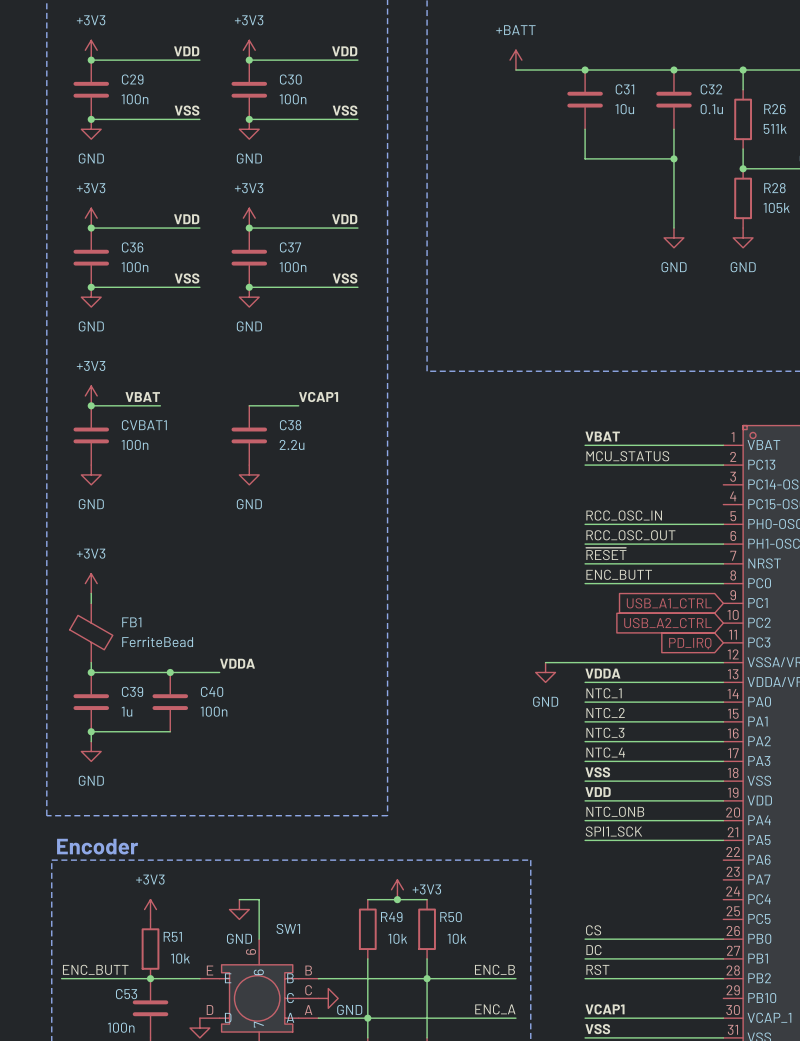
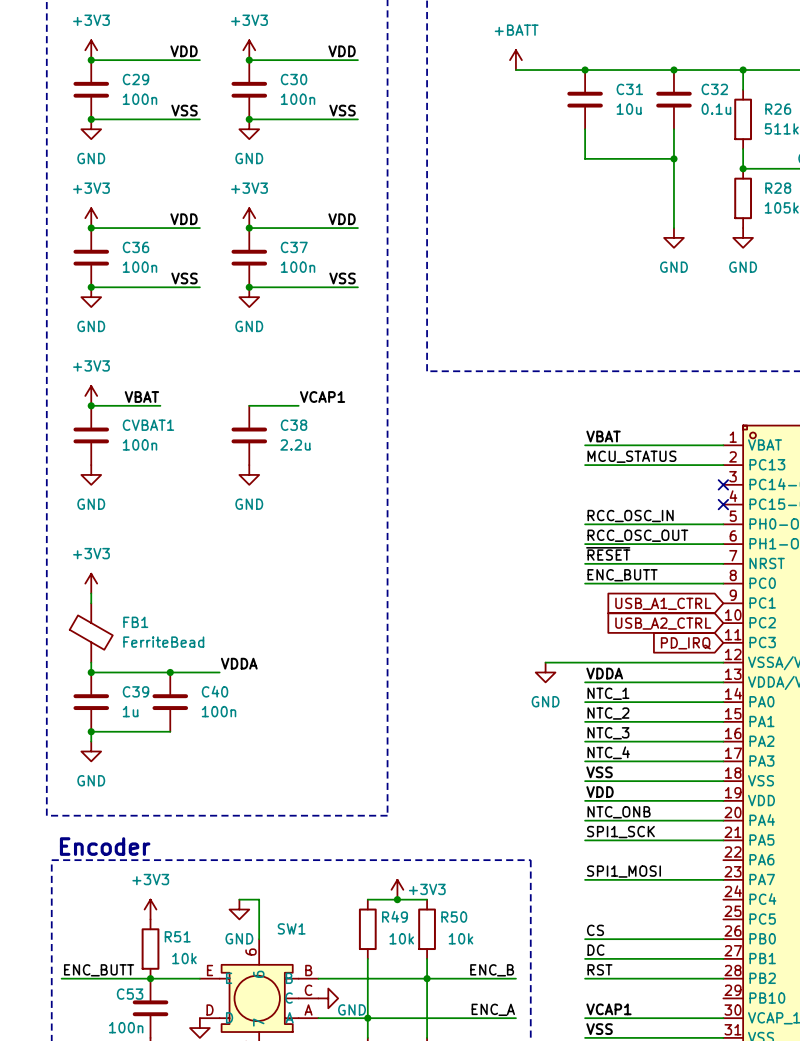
no-connect mark: none -> (723, 484)
no-connect mark: none -> (723, 504)
label: none -> SPI1_MOSI (623, 871)
wire: none -> (585, 879) (723, 879)

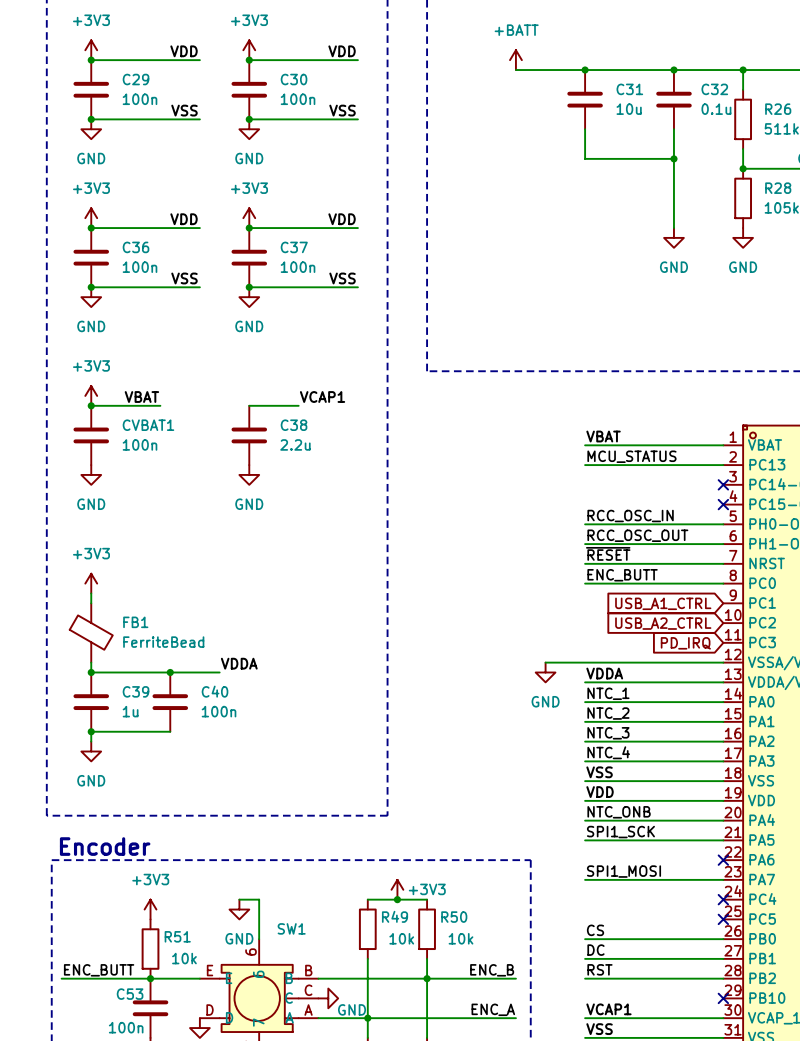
no-connect mark: none -> (723, 860)
no-connect mark: none -> (723, 899)
no-connect mark: none -> (723, 919)
no-connect mark: none -> (723, 998)

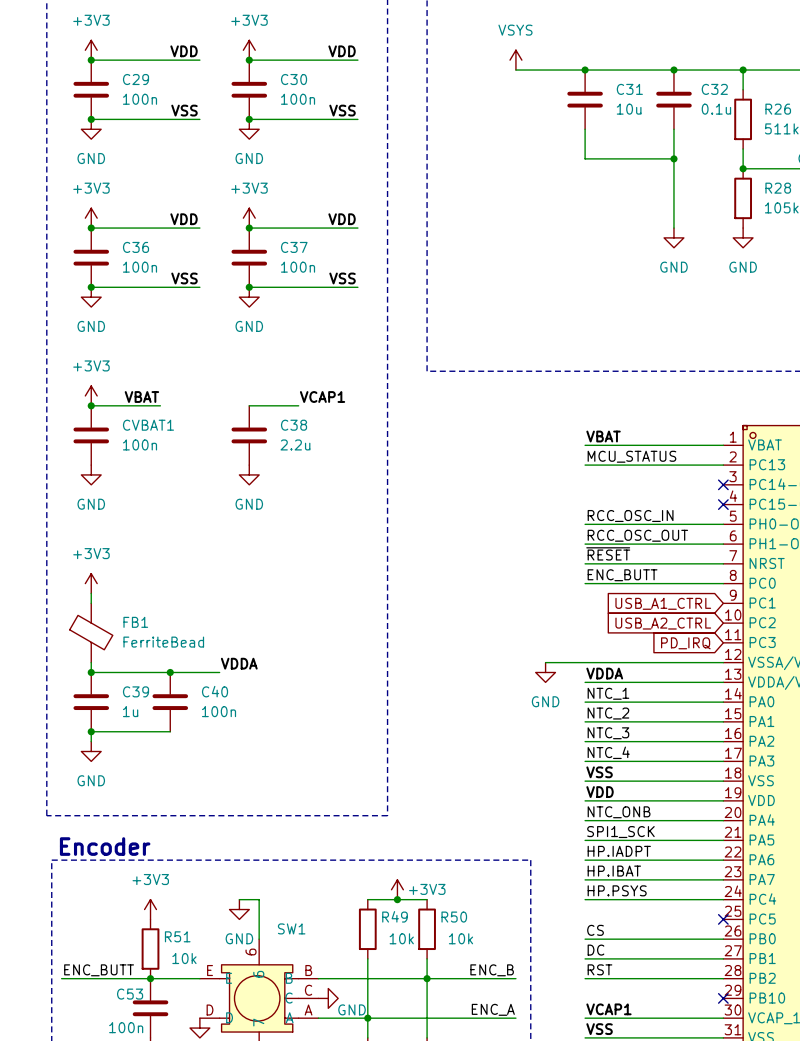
power symbol: +BATT (515, 60) -> VSYS (515, 60)
label: none -> HP.IADPT (619, 851)
wire: none -> (585, 860) (723, 860)
no-connect mark: (723, 860) -> none
label: SPI1_MOSI (623, 871) -> HP.IBAT (614, 871)
label: none -> HP.PSYS (617, 890)
wire: none -> (585, 899) (723, 899)
no-connect mark: (723, 899) -> none

